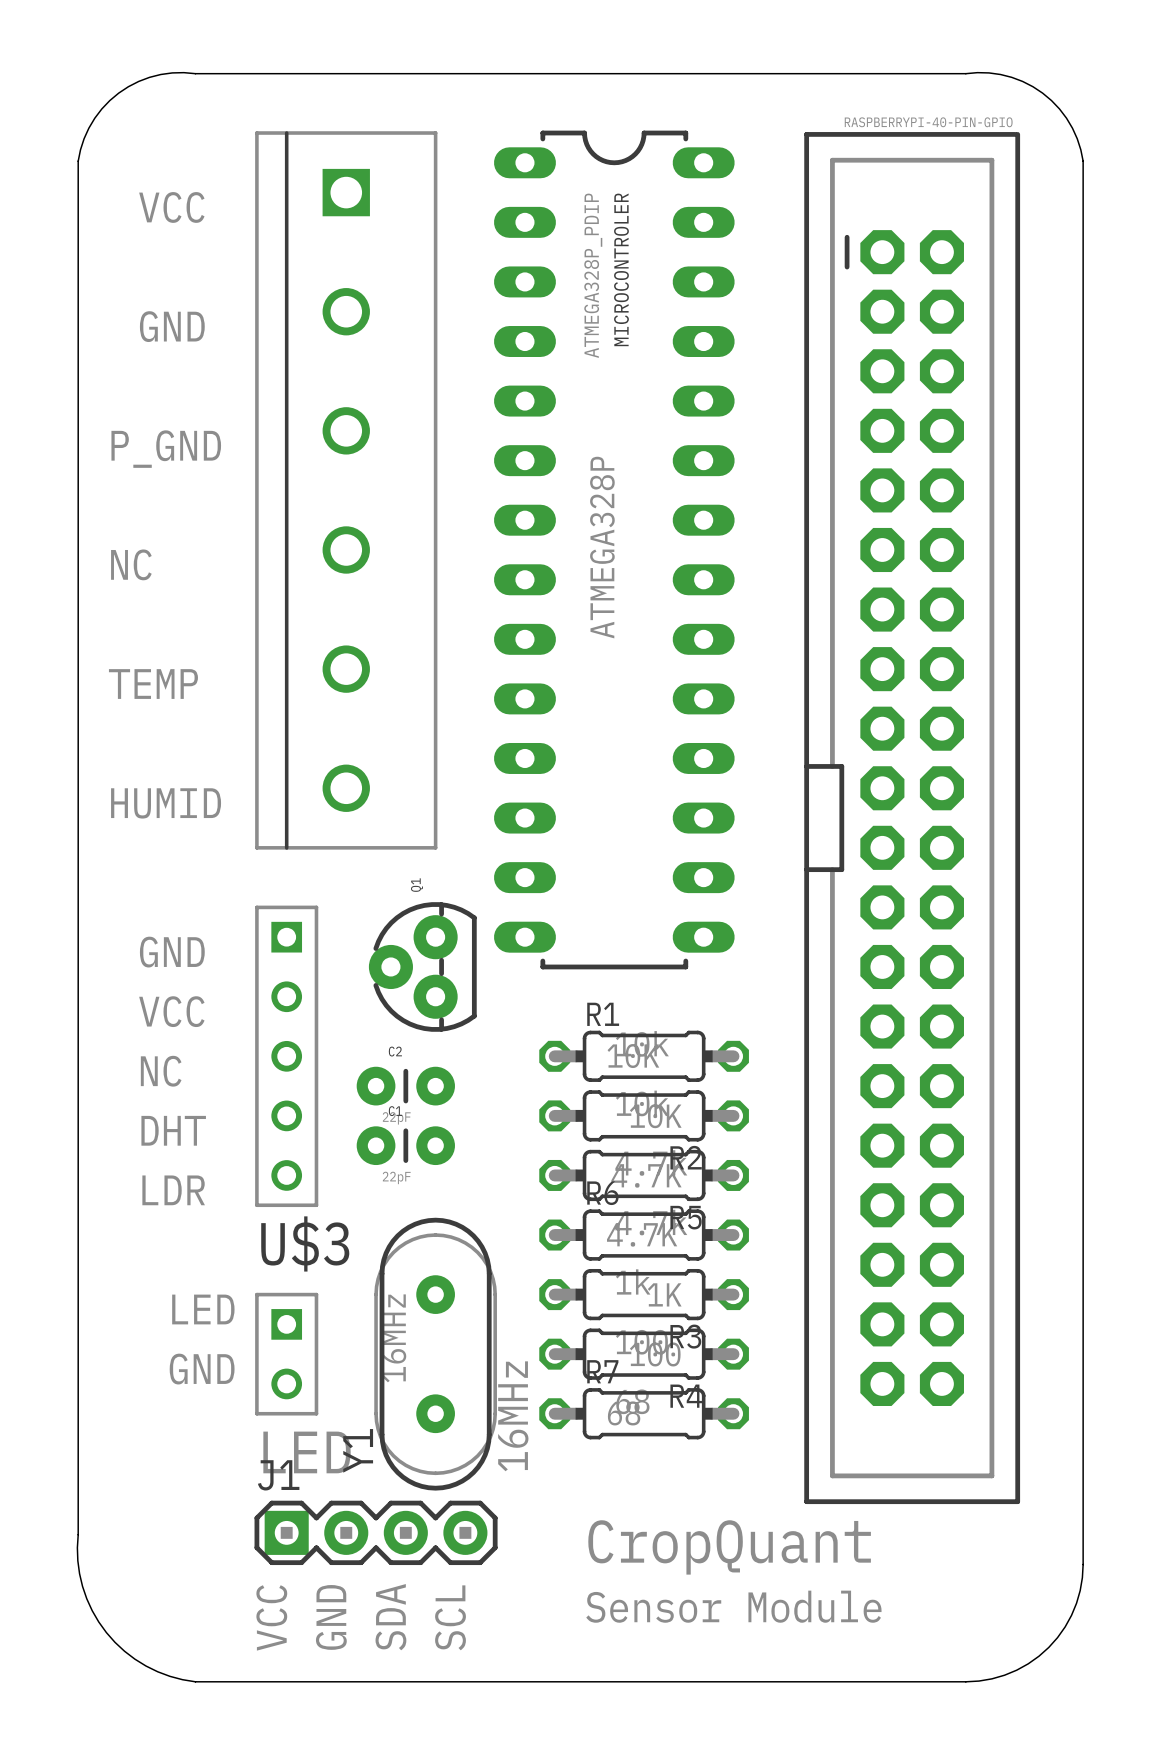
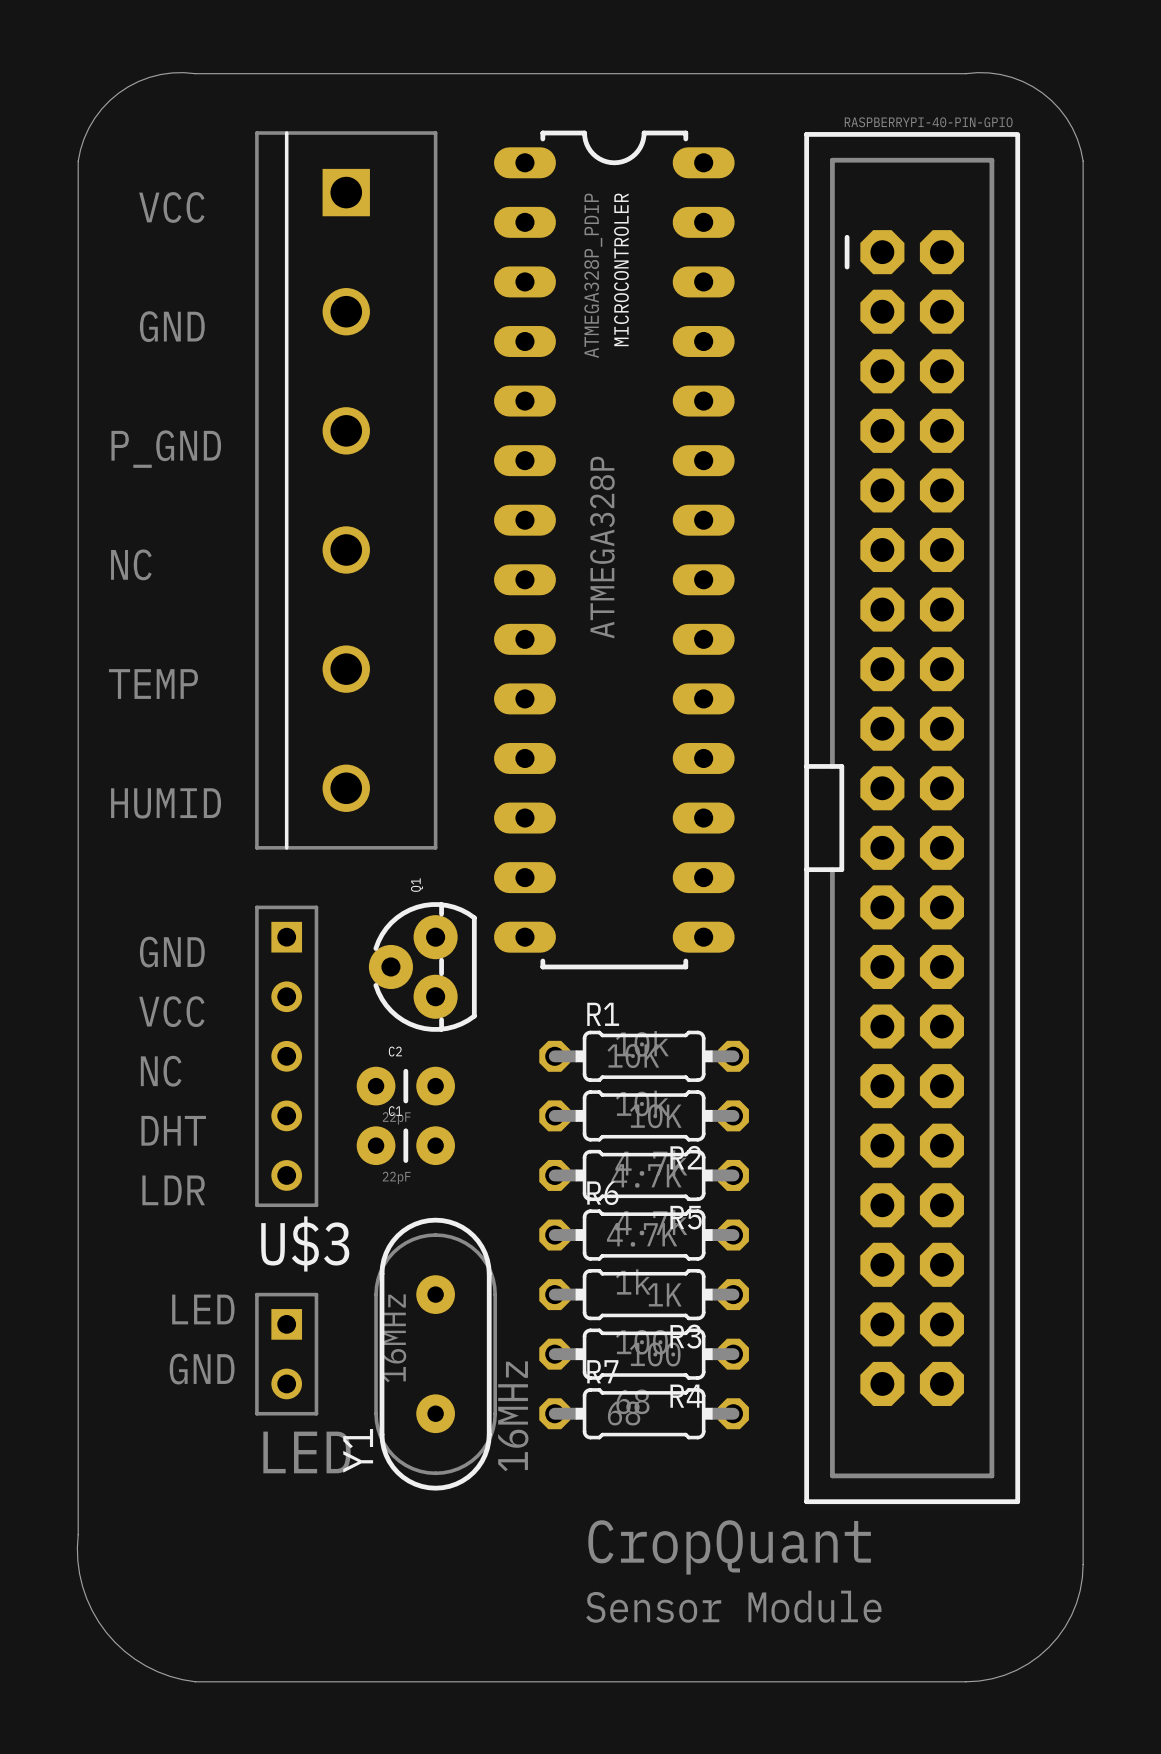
J1: (376, 1532) -> none
text: VCC (271, 1617) -> none
text: GND (331, 1617) -> none
text: SDA (390, 1617) -> none
text: SCL (450, 1617) -> none

